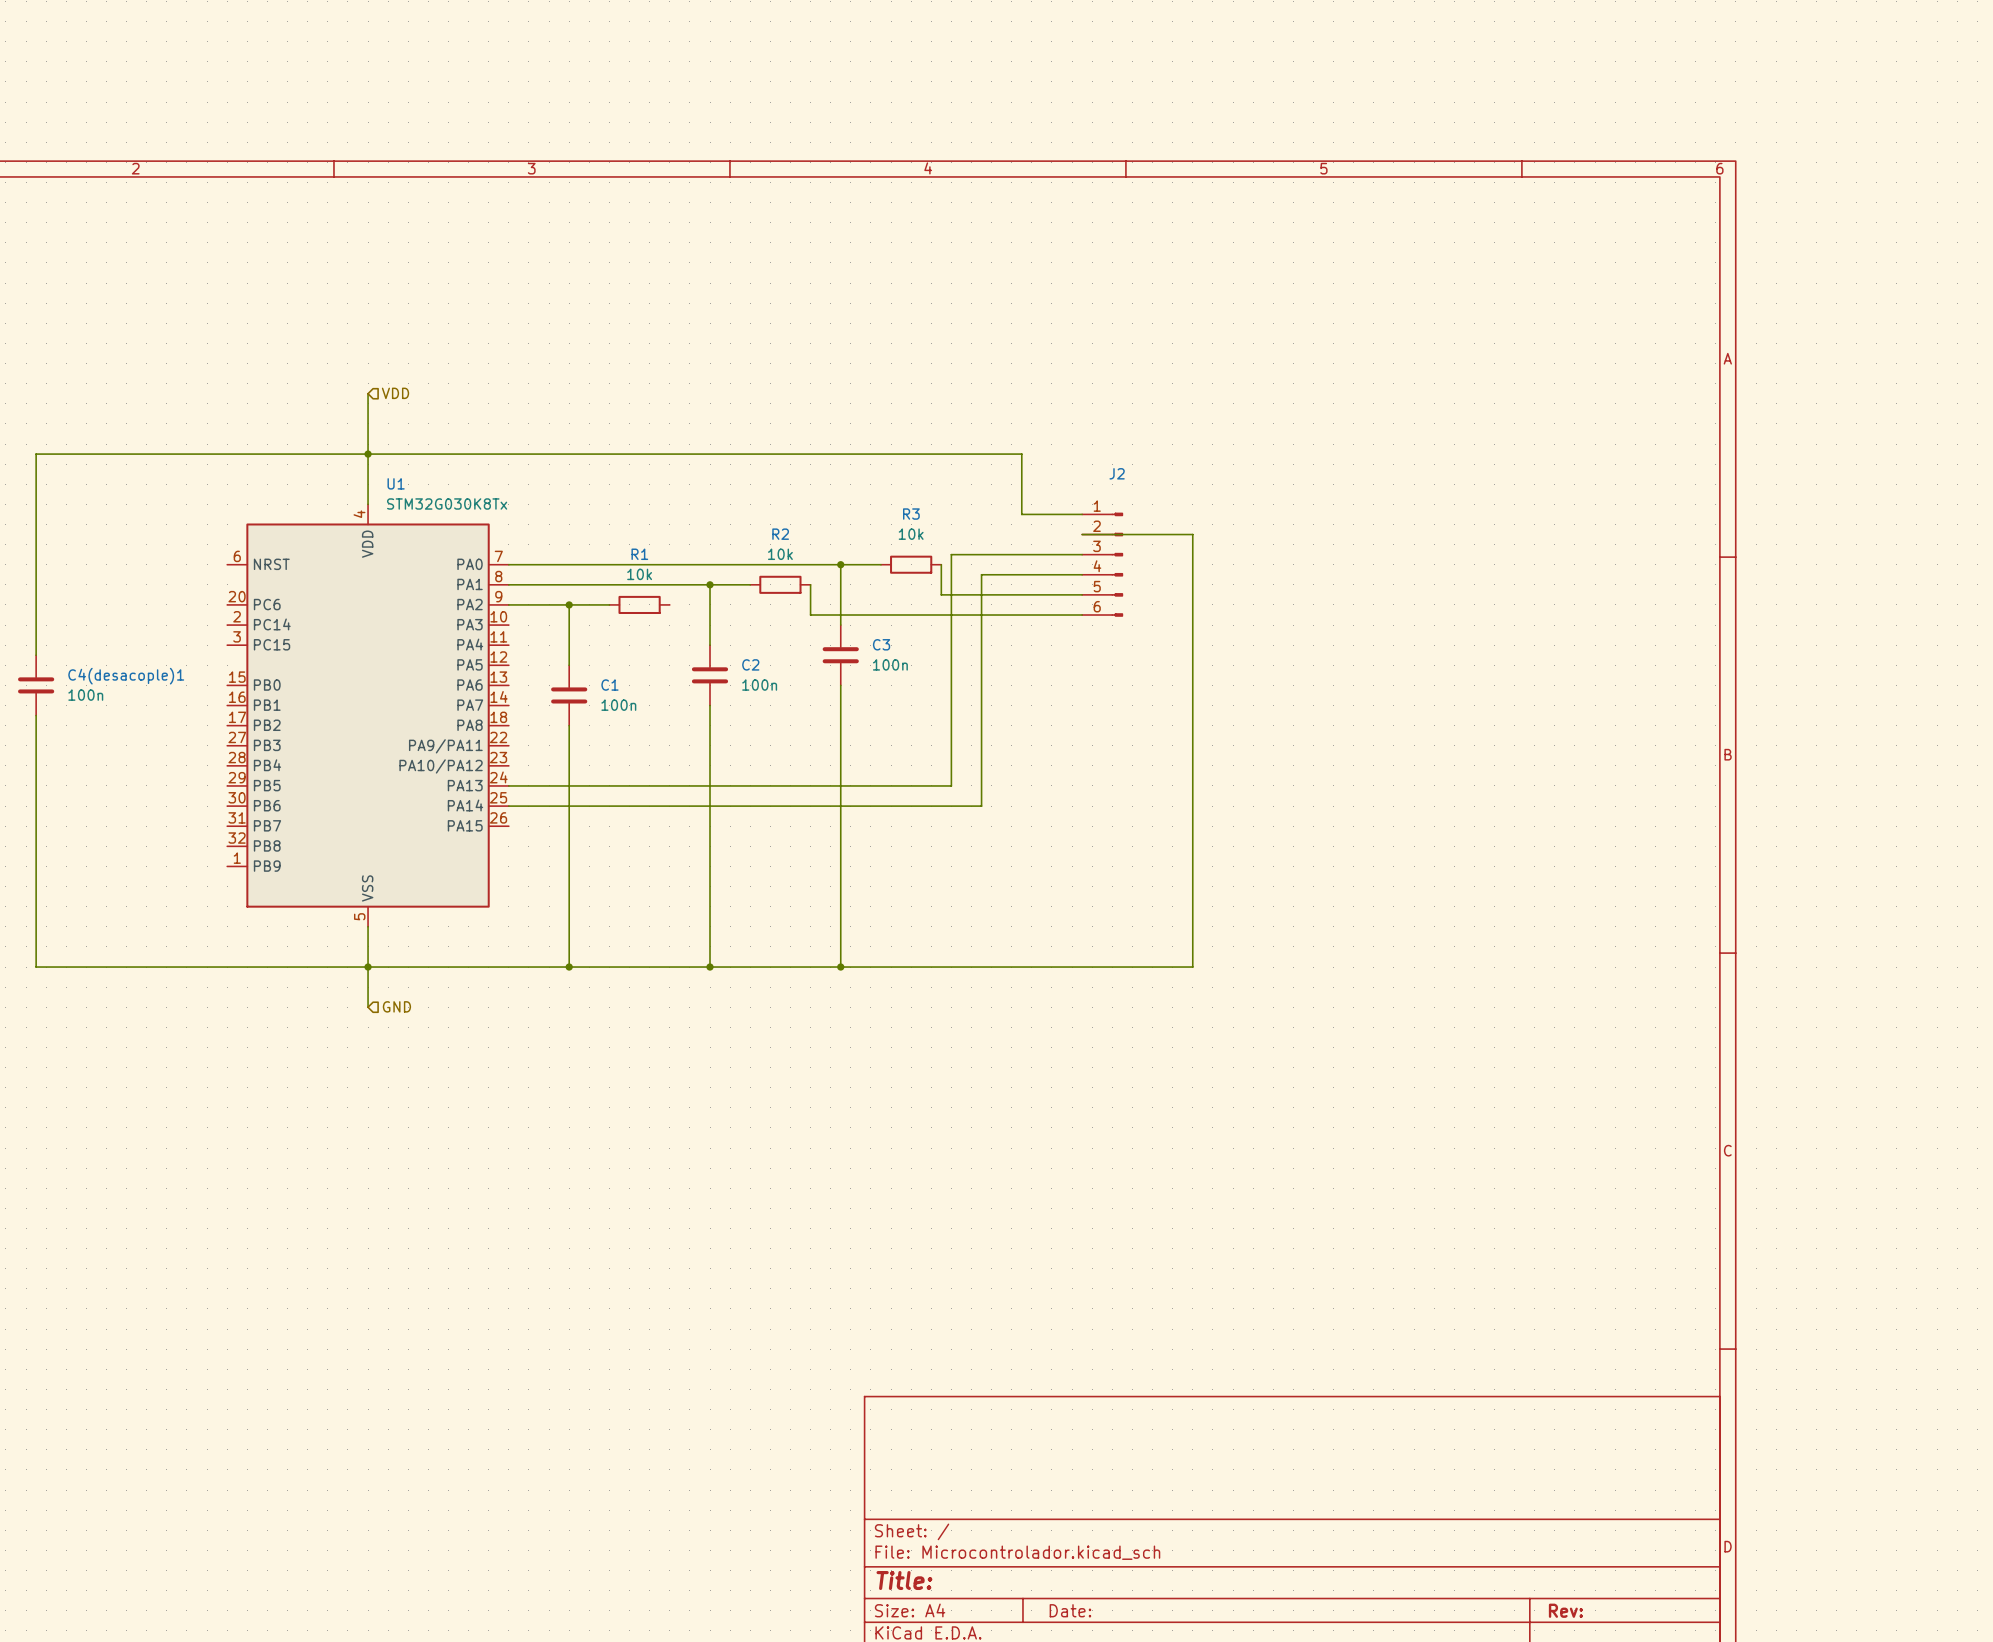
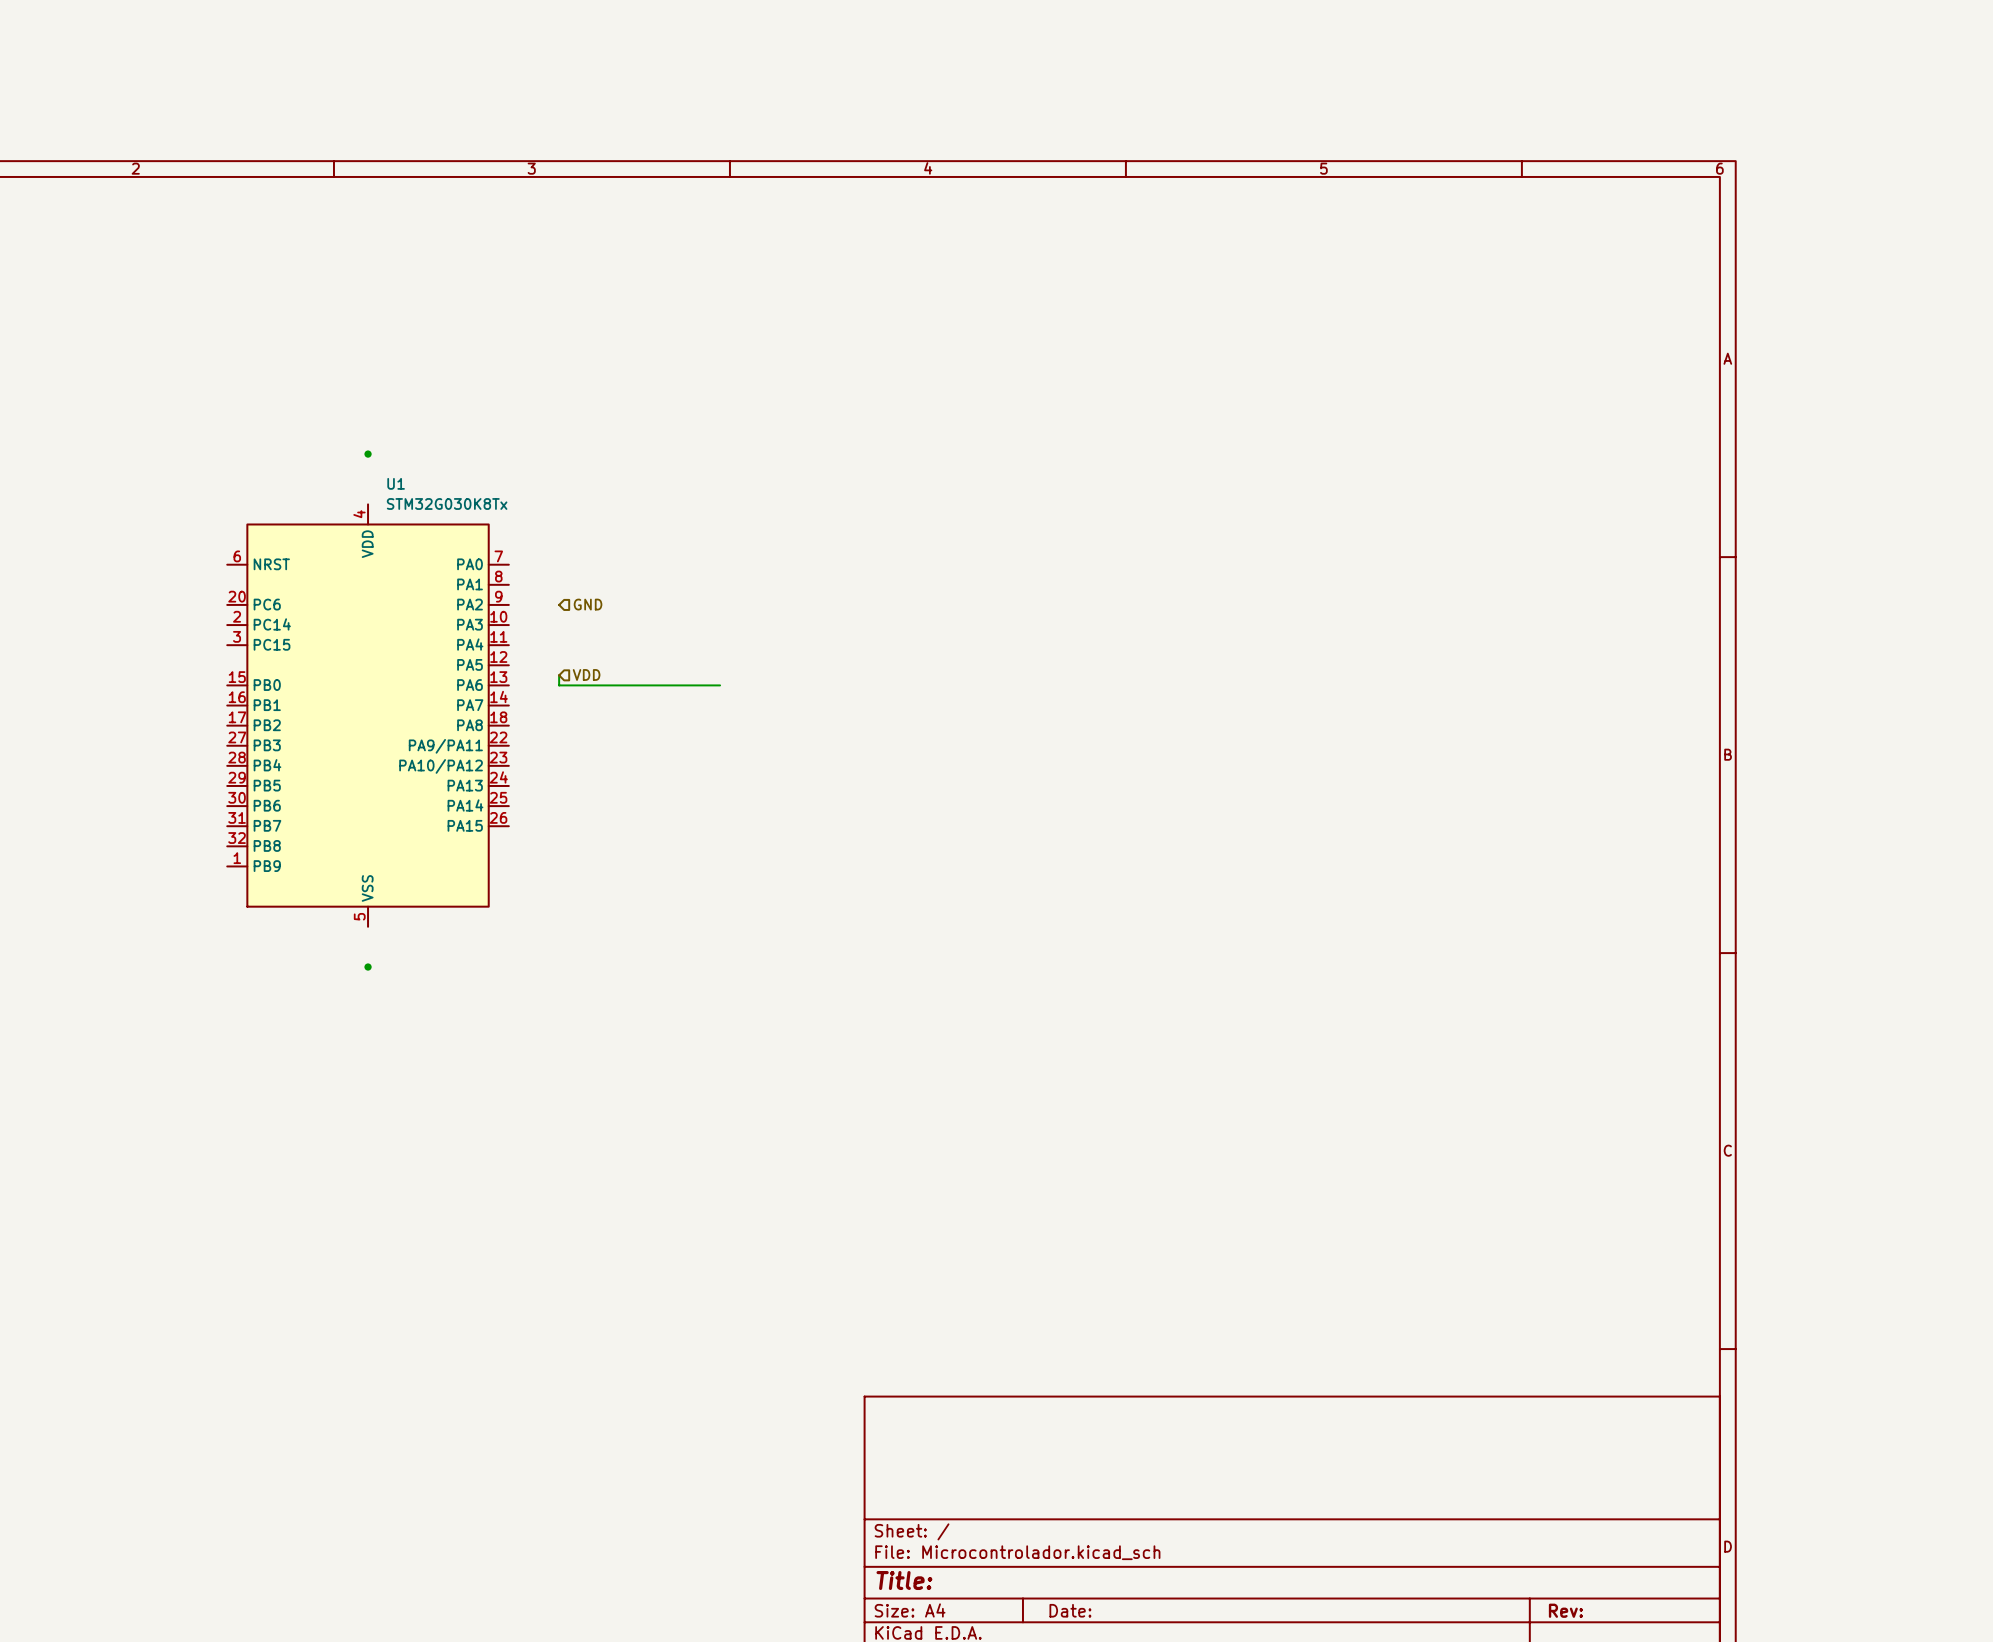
wire: (368, 393) (368, 504) -> none
hierarchical label: VDD (395, 393) -> none
wire: (1082, 514) (1021, 514) (1021, 454) (36, 454) (36, 655) -> none
wire: (1082, 534) (1192, 534) (1192, 967) (36, 967) (36, 715) -> none
wire: (1082, 554) (951, 554) (951, 785) (508, 785) -> none
wire: (508, 564) (880, 564) -> none
wire: (840, 564) (840, 625) -> none
junction: (840, 564) -> none
R3: 10k (911, 564) -> none
wire: (941, 564) (941, 594) (1082, 594) -> none
J2: (1102, 564) -> none
wire: (1082, 574) (981, 574) (981, 806) (508, 806) -> none
wire: (508, 584) (750, 584) -> none
wire: (710, 584) (710, 645) -> none
junction: (710, 584) -> none
R2: 10k (780, 584) -> none
wire: (810, 584) (810, 615) (1082, 615) -> none
wire: (508, 604) (609, 604) -> none
wire: (569, 604) (569, 665) -> none
junction: (569, 604) -> none
hierarchical label: none -> GND (588, 604)
R1: 10k (639, 604) -> none
C3: 100n (840, 655) -> none
hierarchical label: none -> VDD (586, 674)
wire: none -> (559, 675) (559, 685) (720, 685)
C2: 100n (710, 675) -> none
C4(desacople)1: 100n (36, 685) -> none
wire: (840, 685) (840, 967) -> none
C1: 100n (569, 695) -> none
wire: (710, 705) (710, 967) -> none
wire: (569, 725) (569, 967) -> none
wire: (368, 926) (368, 1007) -> none
junction: (569, 967) -> none
junction: (710, 967) -> none
junction: (840, 967) -> none
hierarchical label: GND (396, 1006) -> none

